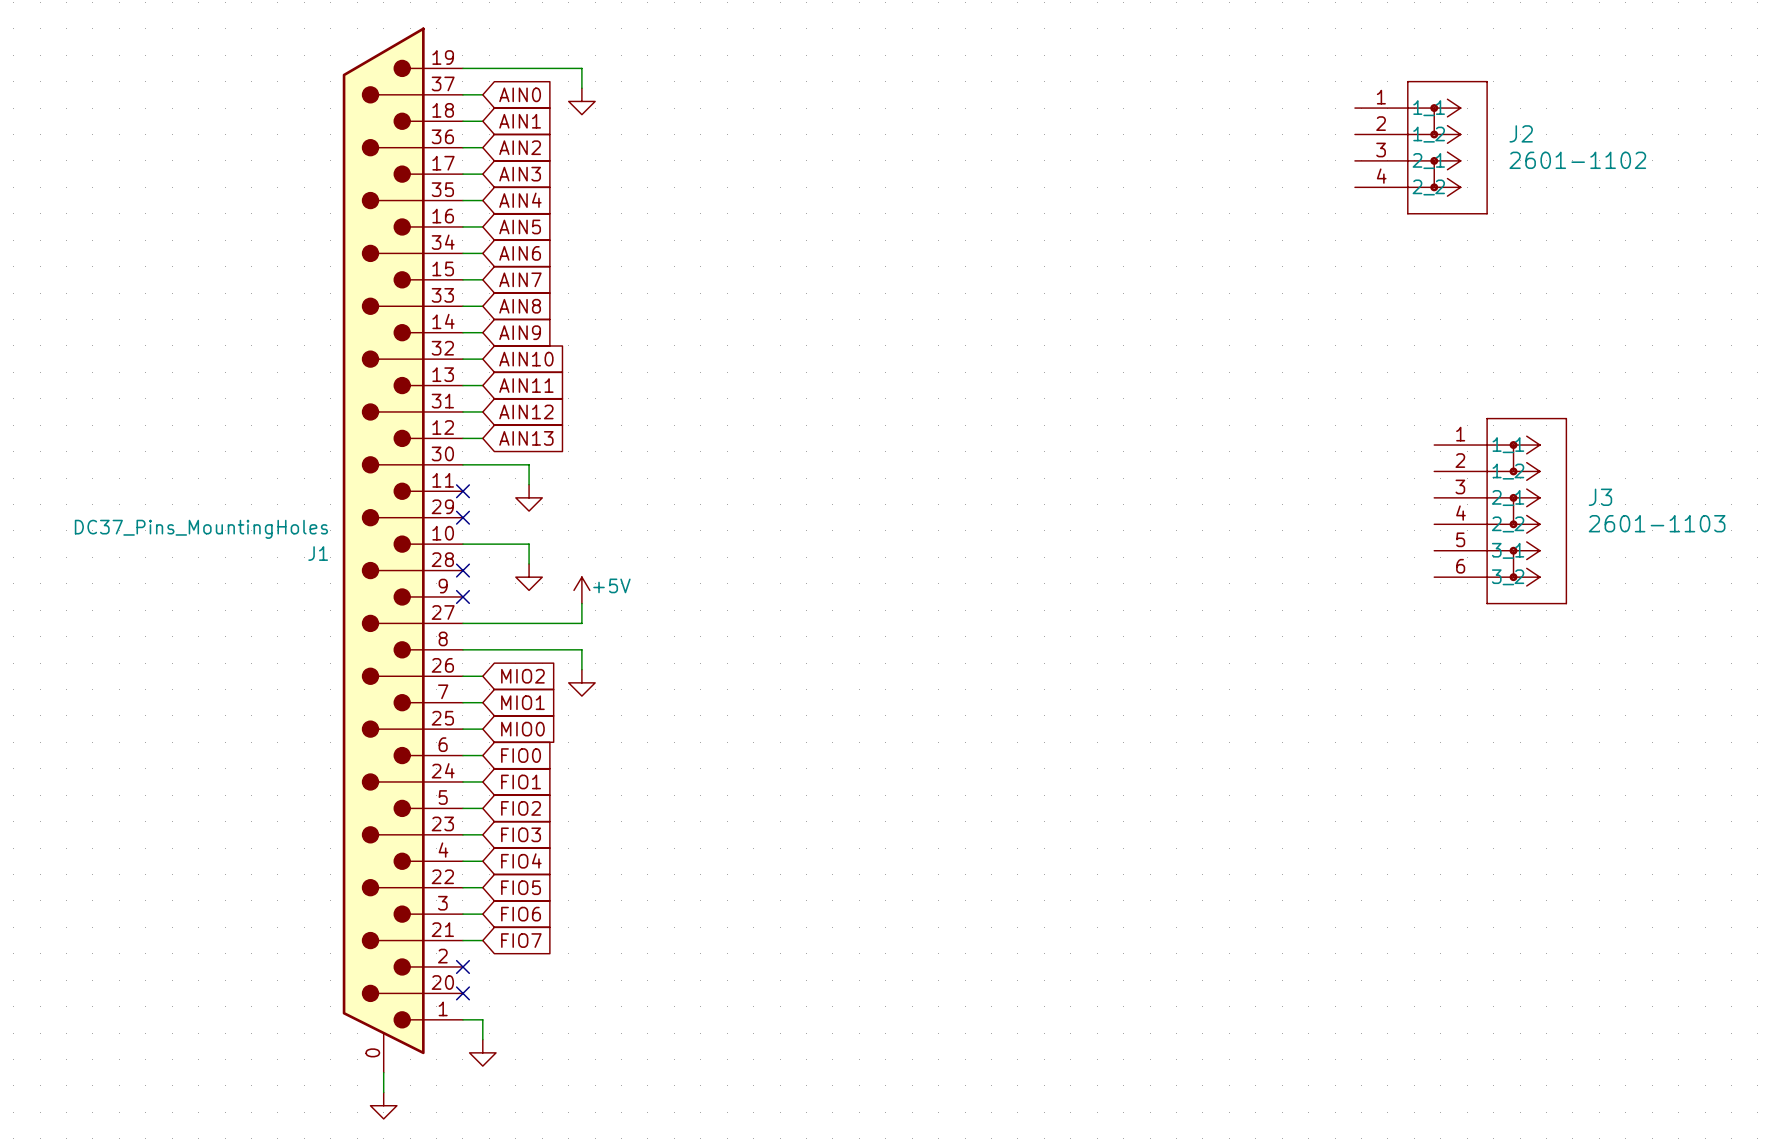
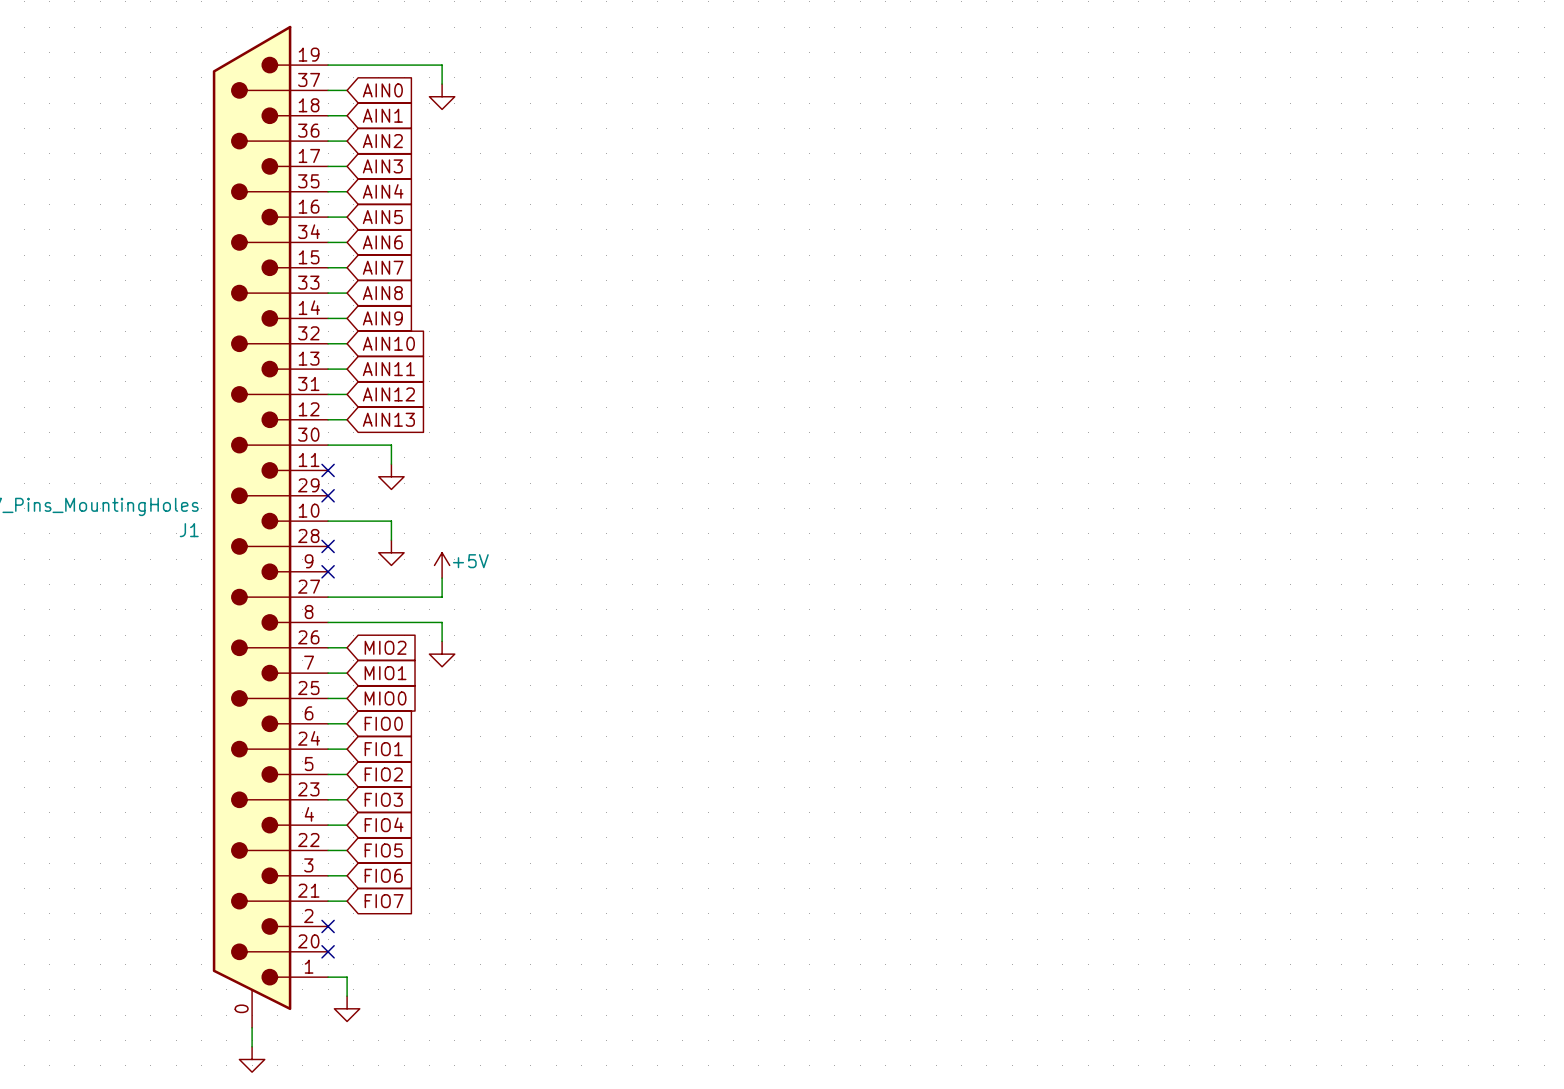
J2: 2601-1102 (1421, 147) -> none
J3: 2601-1103 (1500, 511) -> none

